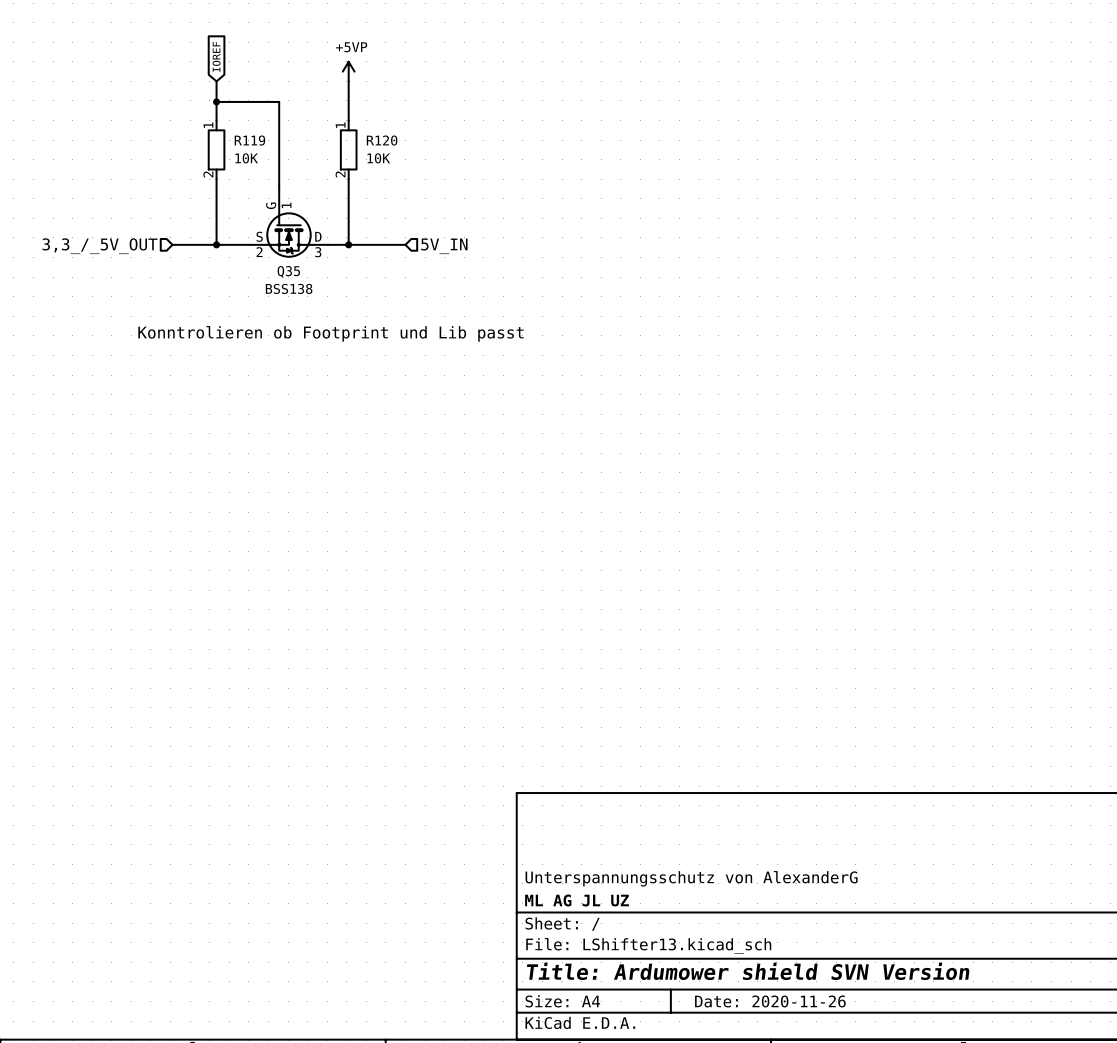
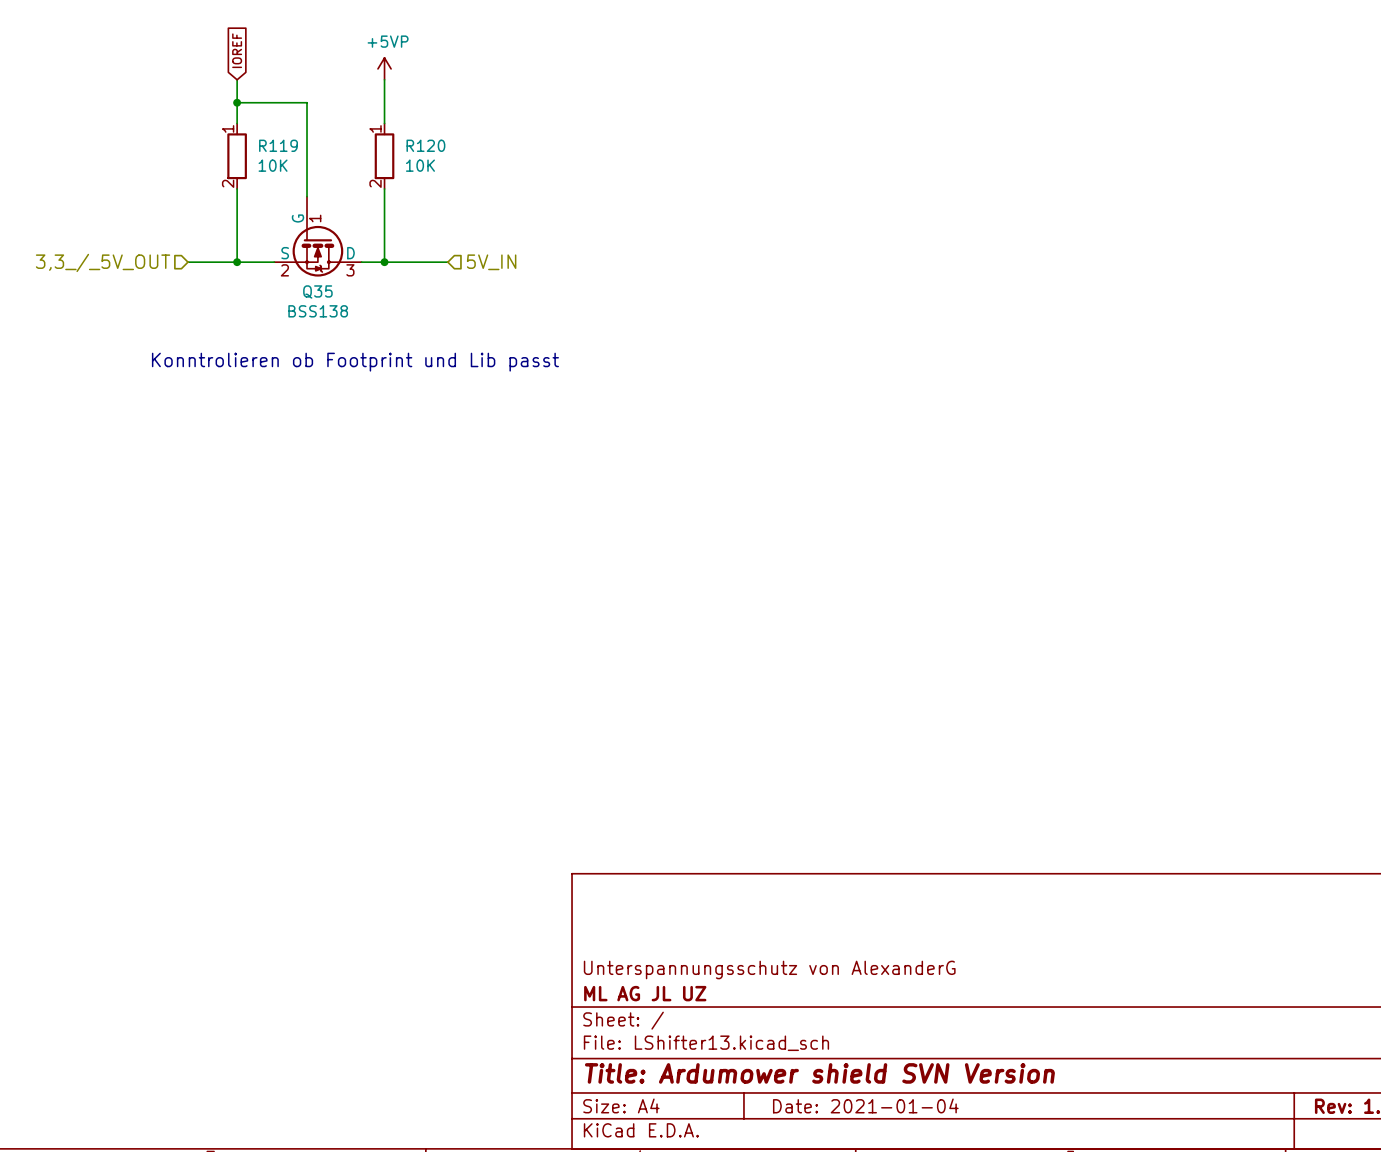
title block: Date: 2020-11-26 (770, 1001) -> Date: 2021-01-04 (865, 1105)

